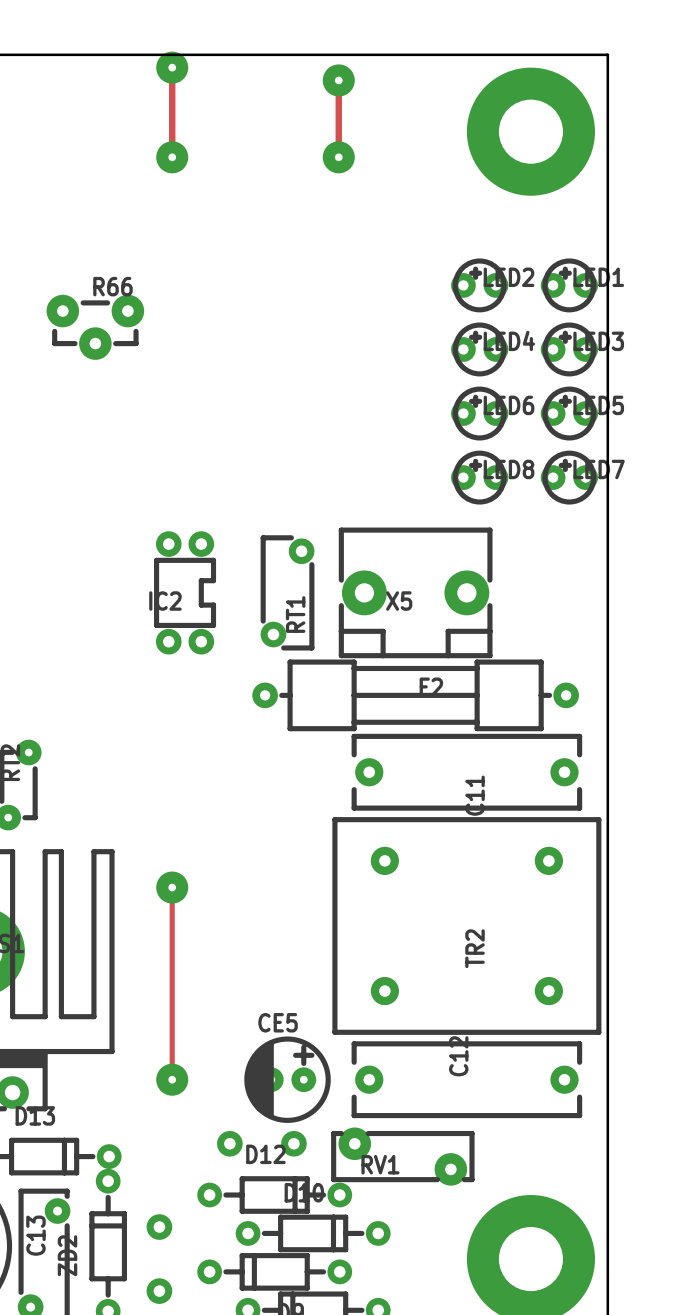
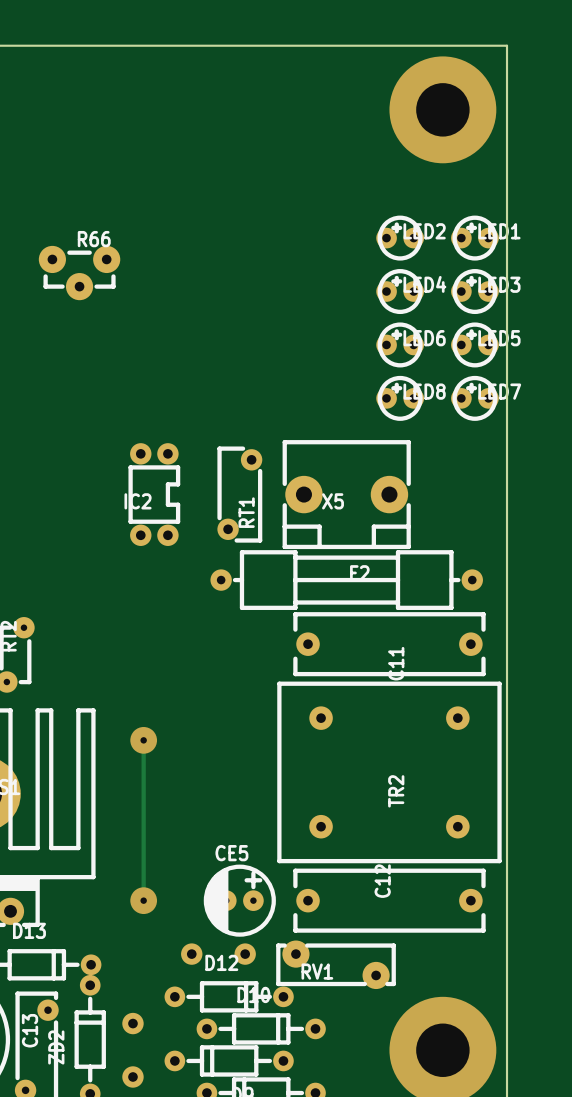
track: (172, 67) (172, 157) -> none
via: (172, 67) -> none
track: (338, 80) (338, 157) -> none
via: (338, 80) -> none
via: (172, 157) -> none
via: (338, 157) -> none

